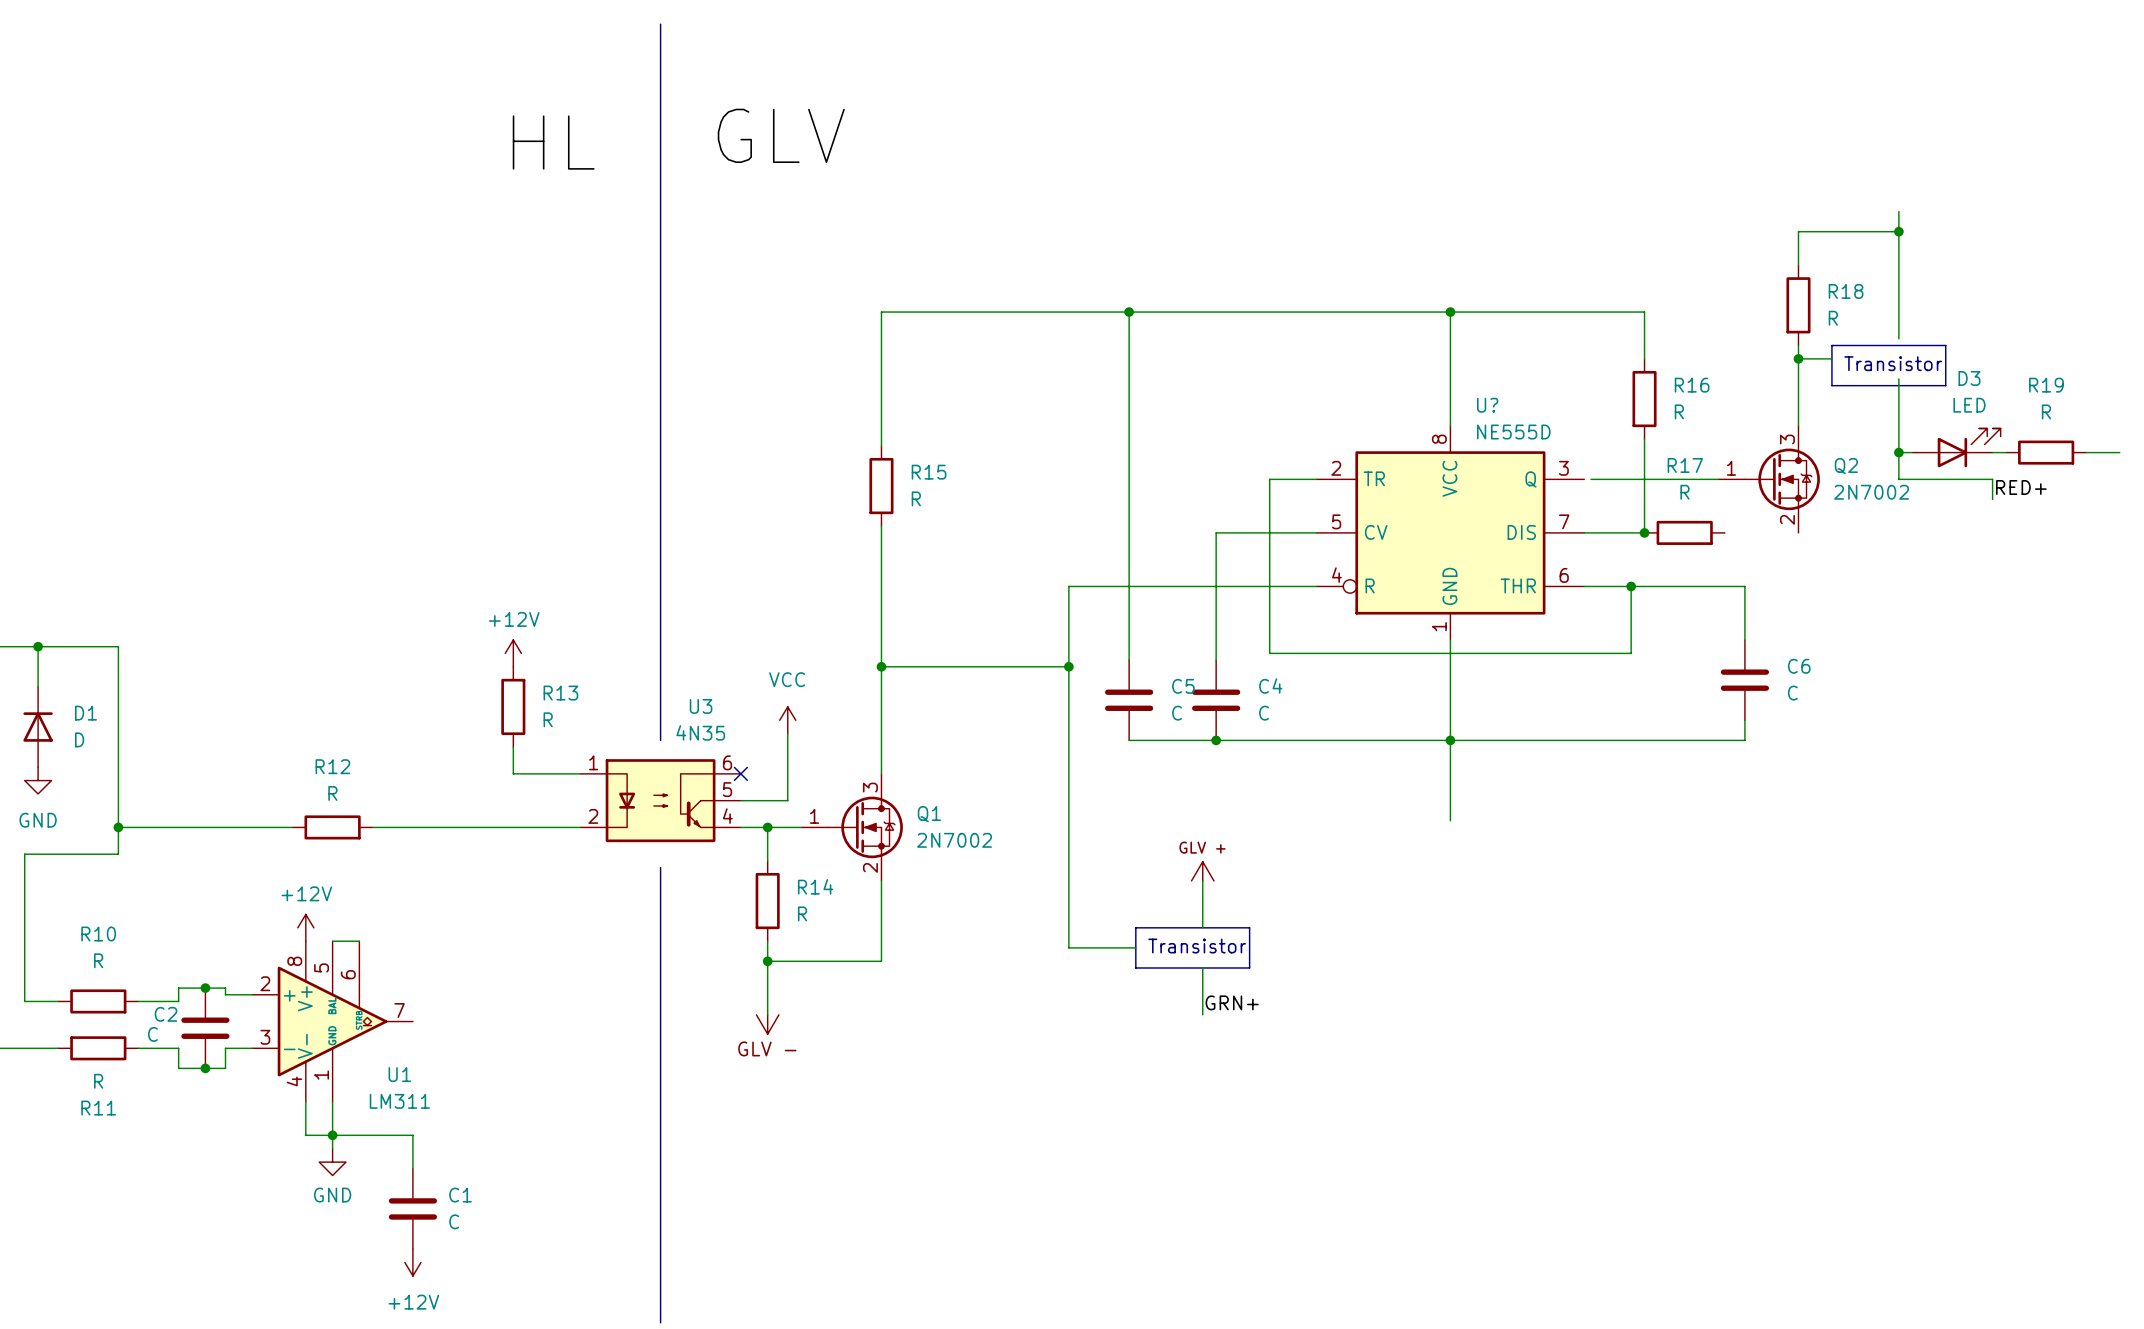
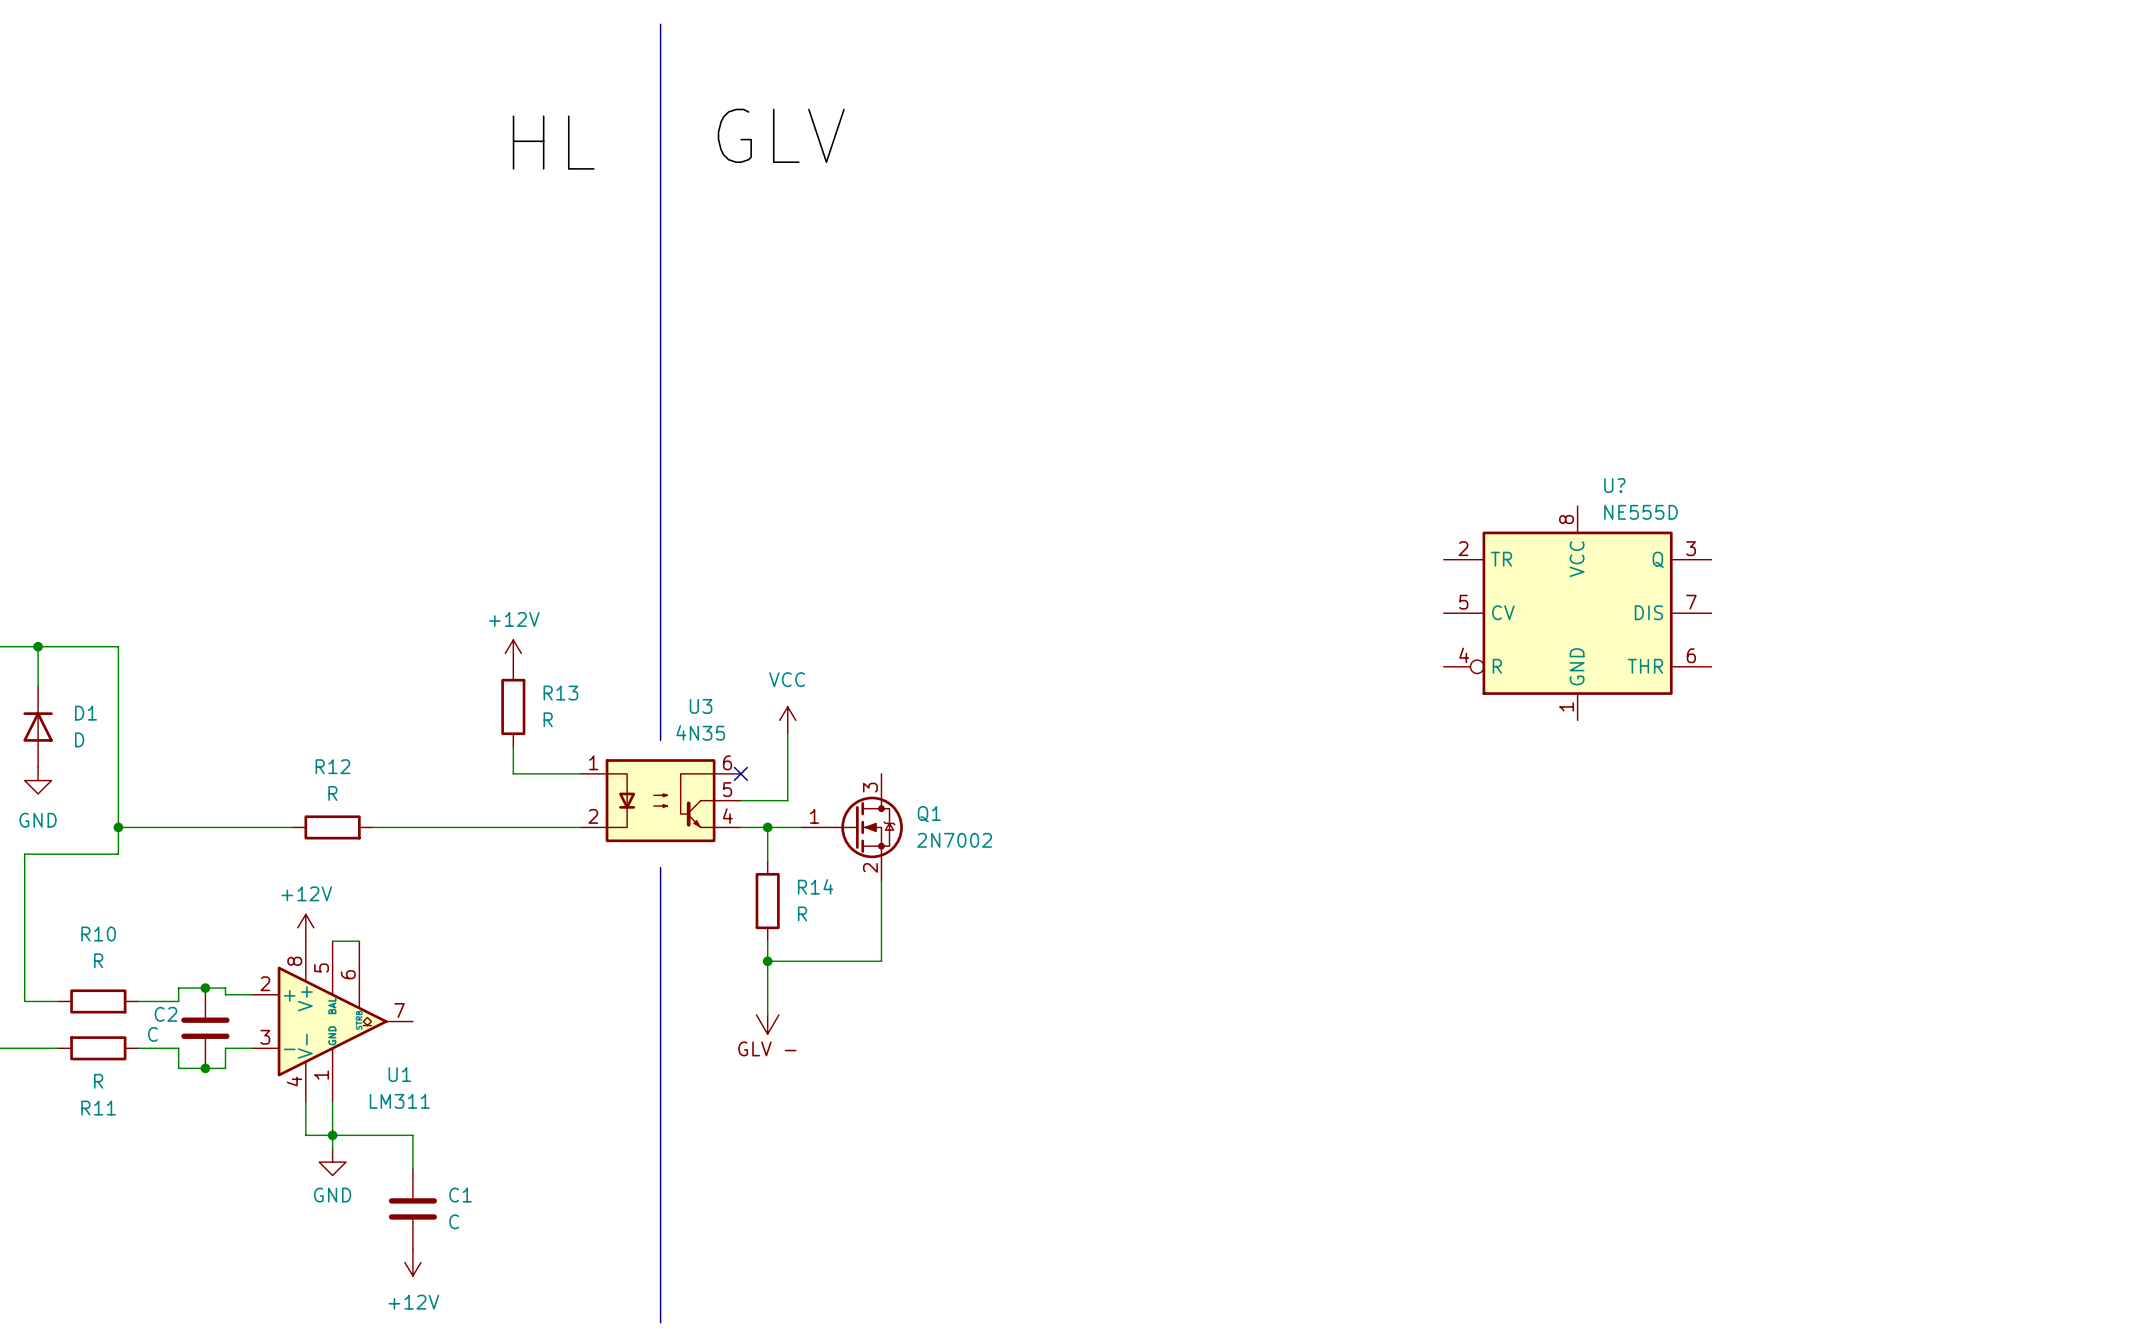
wire: (1898, 211) (1898, 338) -> none
wire: (1898, 231) (1798, 231) (1798, 265) -> none
junction: (1898, 231) -> none
R18: R (1798, 305) -> none
wire: (1129, 312) (1129, 660) -> none
junction: (1129, 312) -> none
wire: (1450, 312) (1450, 425) -> none
junction: (1450, 312) -> none
wire: (1798, 345) (1798, 425) -> none
line: (1831, 345) (1945, 345) (1945, 385) (1831, 385) (1831, 345) -> none
wire: (1644, 358) (1644, 312) (881, 312) (881, 445) -> none
wire: (1798, 358) (1831, 358) -> none
junction: (1798, 358) -> none
text: Transistor (1893, 363) -> none
wire: (1898, 378) (1898, 479) (1992, 479) (1992, 499) -> none
R16: R (1644, 399) -> none
wire: (1644, 439) (1644, 532) (1584, 532) -> none
D3: LED (1956, 447) -> none
wire: (1898, 452) (1912, 452) -> none
junction: (1898, 452) -> none
wire: (1992, 452) (2005, 452) -> none
R19: R (2046, 452) -> none
wire: (2086, 452) (2119, 452) -> none
wire: (1316, 479) (1269, 479) (1269, 653) (1631, 653) (1631, 586) -> none
wire: (1590, 479) (1718, 479) -> none
Q2: 2N7002 (1769, 479) -> none
R15: R (881, 486) -> none
label: RED+ (2021, 487) -> none
wire: (881, 526) (881, 773) -> none
wire: (1316, 532) (1216, 532) (1216, 660) -> none
U? position: (1450, 532) -> (1577, 613)
junction: (1644, 532) -> none
R17: R (1684, 532) -> none
wire: (1316, 586) (1068, 586) (1068, 947) (1135, 947) -> none
wire: (1584, 586) (1744, 586) (1744, 640) -> none
junction: (1631, 586) -> none
wire: (1450, 640) (1450, 820) -> none
wire: (881, 666) (1068, 666) -> none
junction: (881, 666) -> none
junction: (1068, 666) -> none
C6: C (1744, 680) -> none
C5: C (1129, 700) -> none
C4: C (1216, 700) -> none
wire: (1744, 720) (1744, 740) (1129, 740) -> none
junction: (1216, 740) -> none
junction: (1450, 740) -> none
power symbol: (1202, 871) -> none
wire: (1202, 880) (1202, 927) -> none
line: (1135, 927) (1249, 927) (1249, 967) (1135, 967) (1135, 927) -> none
text: Transistor (1197, 946) -> none
wire: (1202, 967) (1202, 1014) -> none
label: GRN+ (1232, 1002) -> none

